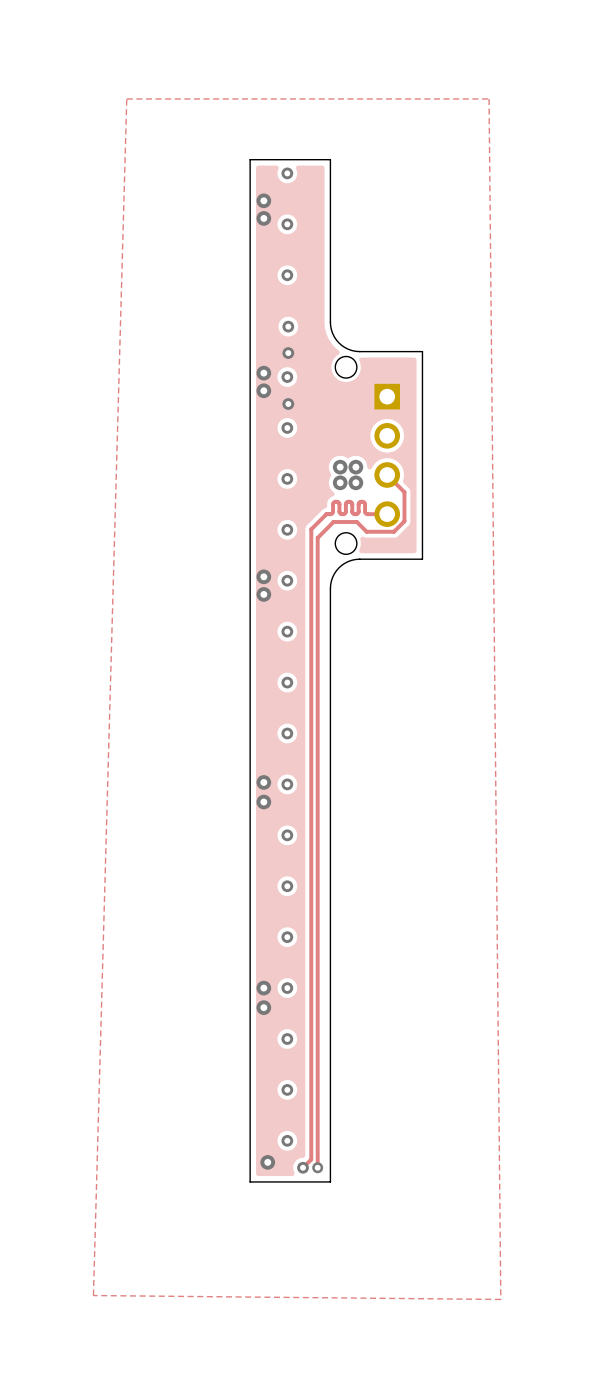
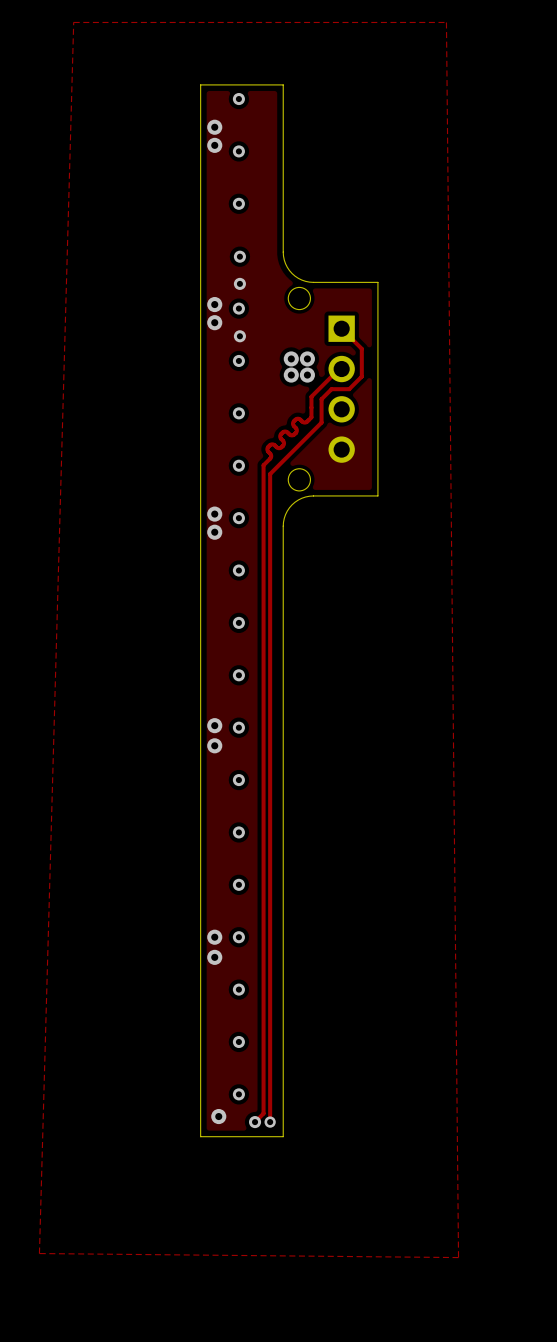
via: none -> (291, 358)
via: none -> (307, 358)
via: none -> (291, 375)
via: none -> (307, 375)
via: (340, 467) -> none
via: (355, 467) -> none
track: (387, 474) (404, 492) (404, 521) (394, 531) (366, 531) (356, 521) (333, 521) -> (341, 328) (361, 348) (361, 376) (349, 389) (331, 389) (321, 399) (321, 422) (286, 457)
via: (340, 482) -> none
via: (355, 482) -> none
track: (387, 514) (366, 513) (364, 503) (362, 501) (358, 503) (357, 513) (352, 513) (352, 503) (348, 501) (345, 503) (345, 512) (341, 514) (339, 503) (335, 501) (333, 503) (332, 513) (326, 514) (317, 522) -> (341, 369) (339, 369) (311, 396) (311, 417) (305, 422) (298, 418) (295, 419) (293, 424) (296, 432) (292, 435) (285, 431) (281, 433) (280, 437) (284, 443) (281, 447) (277, 447) (272, 444) (268, 447) (267, 450) (271, 455) (270, 458)

